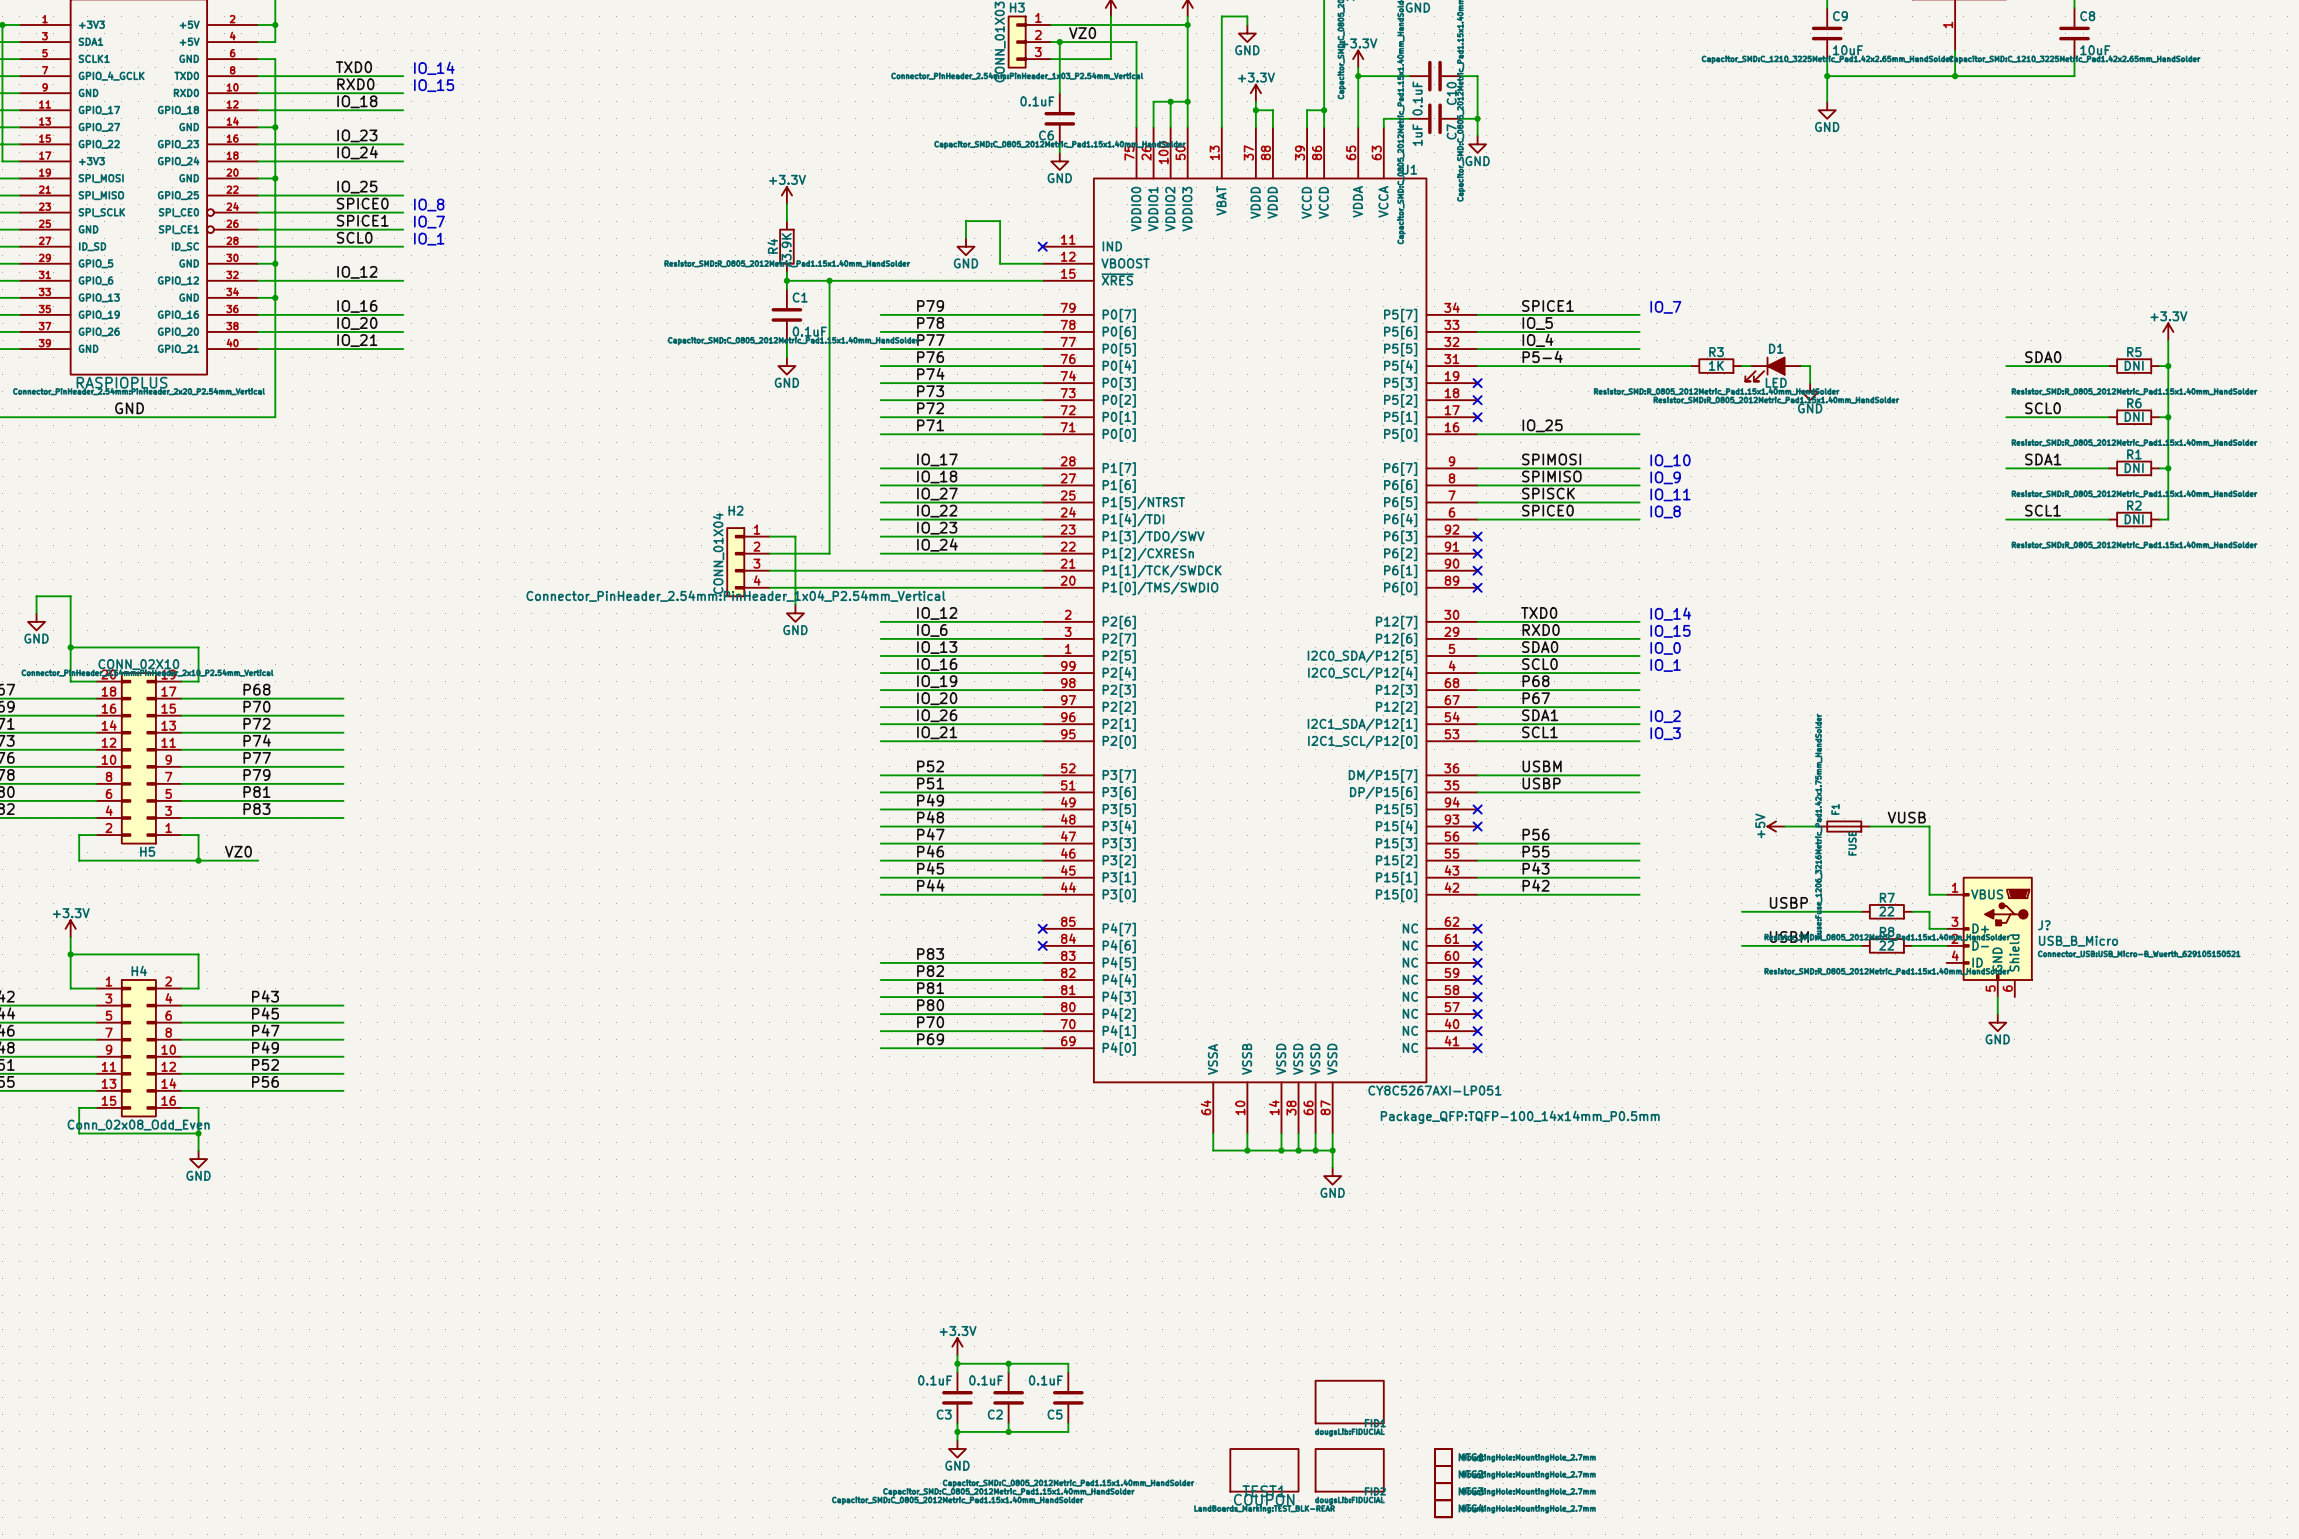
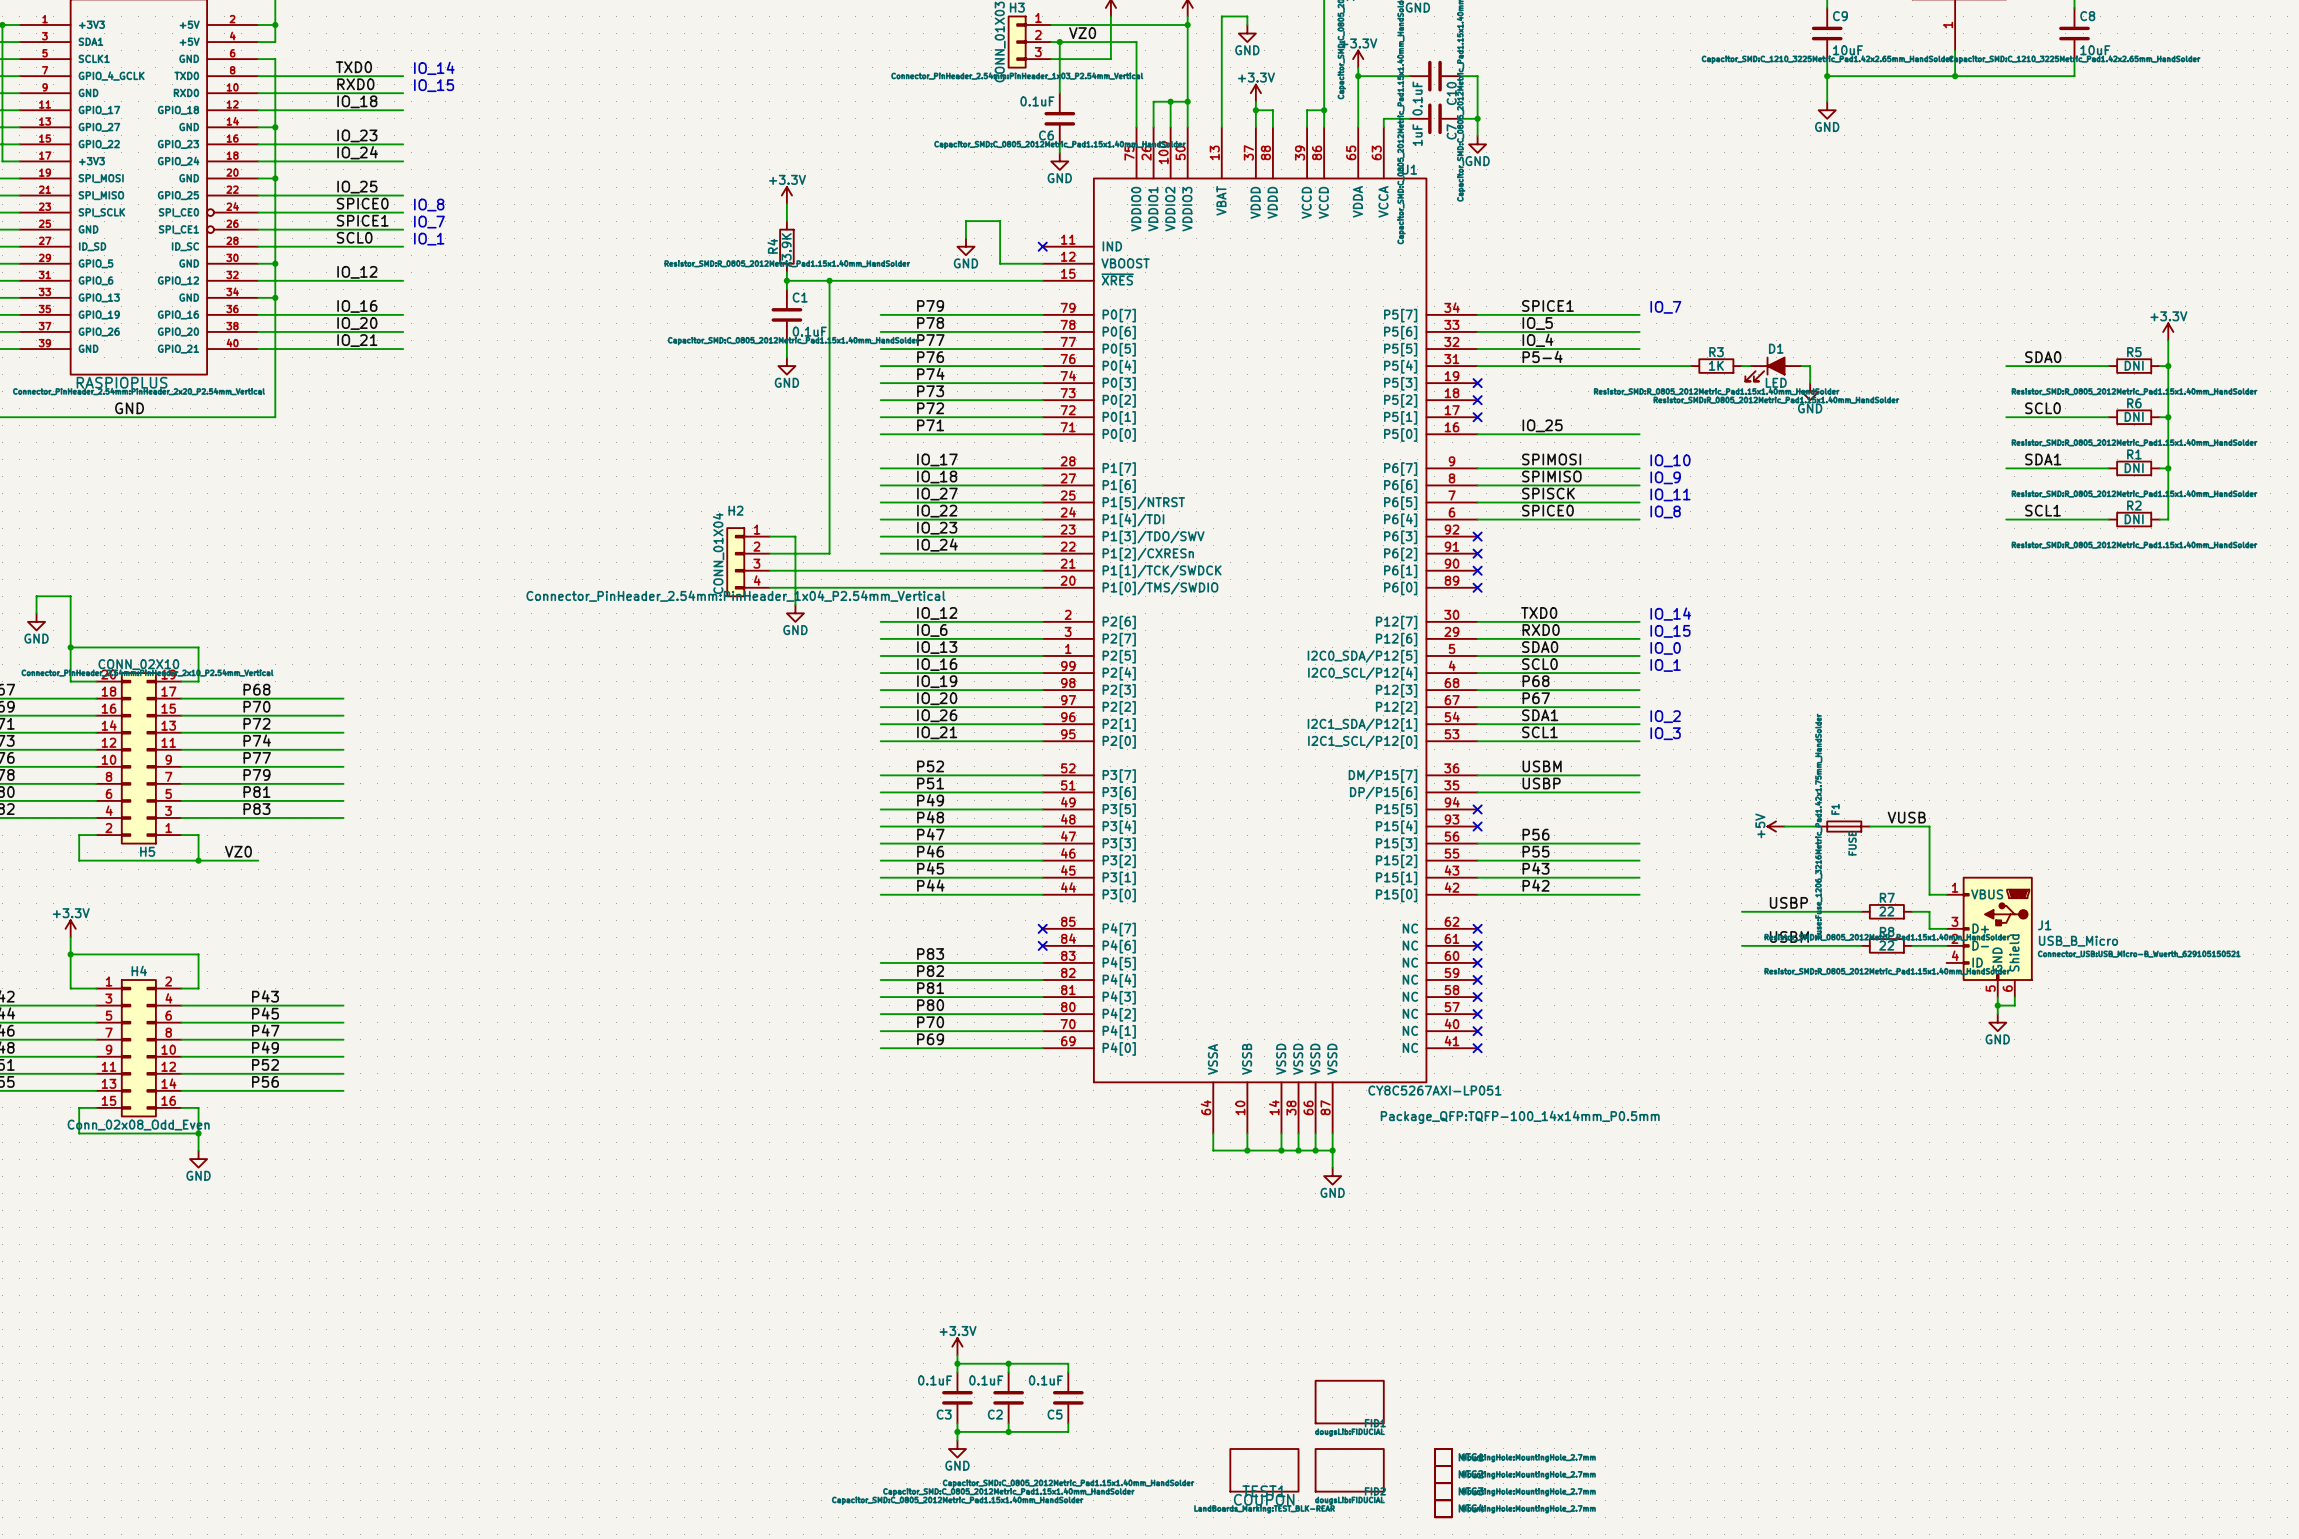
J? name: J? (2044, 925) -> J1 (2044, 925)
wire: none -> (2014, 997) (2014, 1005) (1997, 1005)
junction: none -> (1997, 1005)

